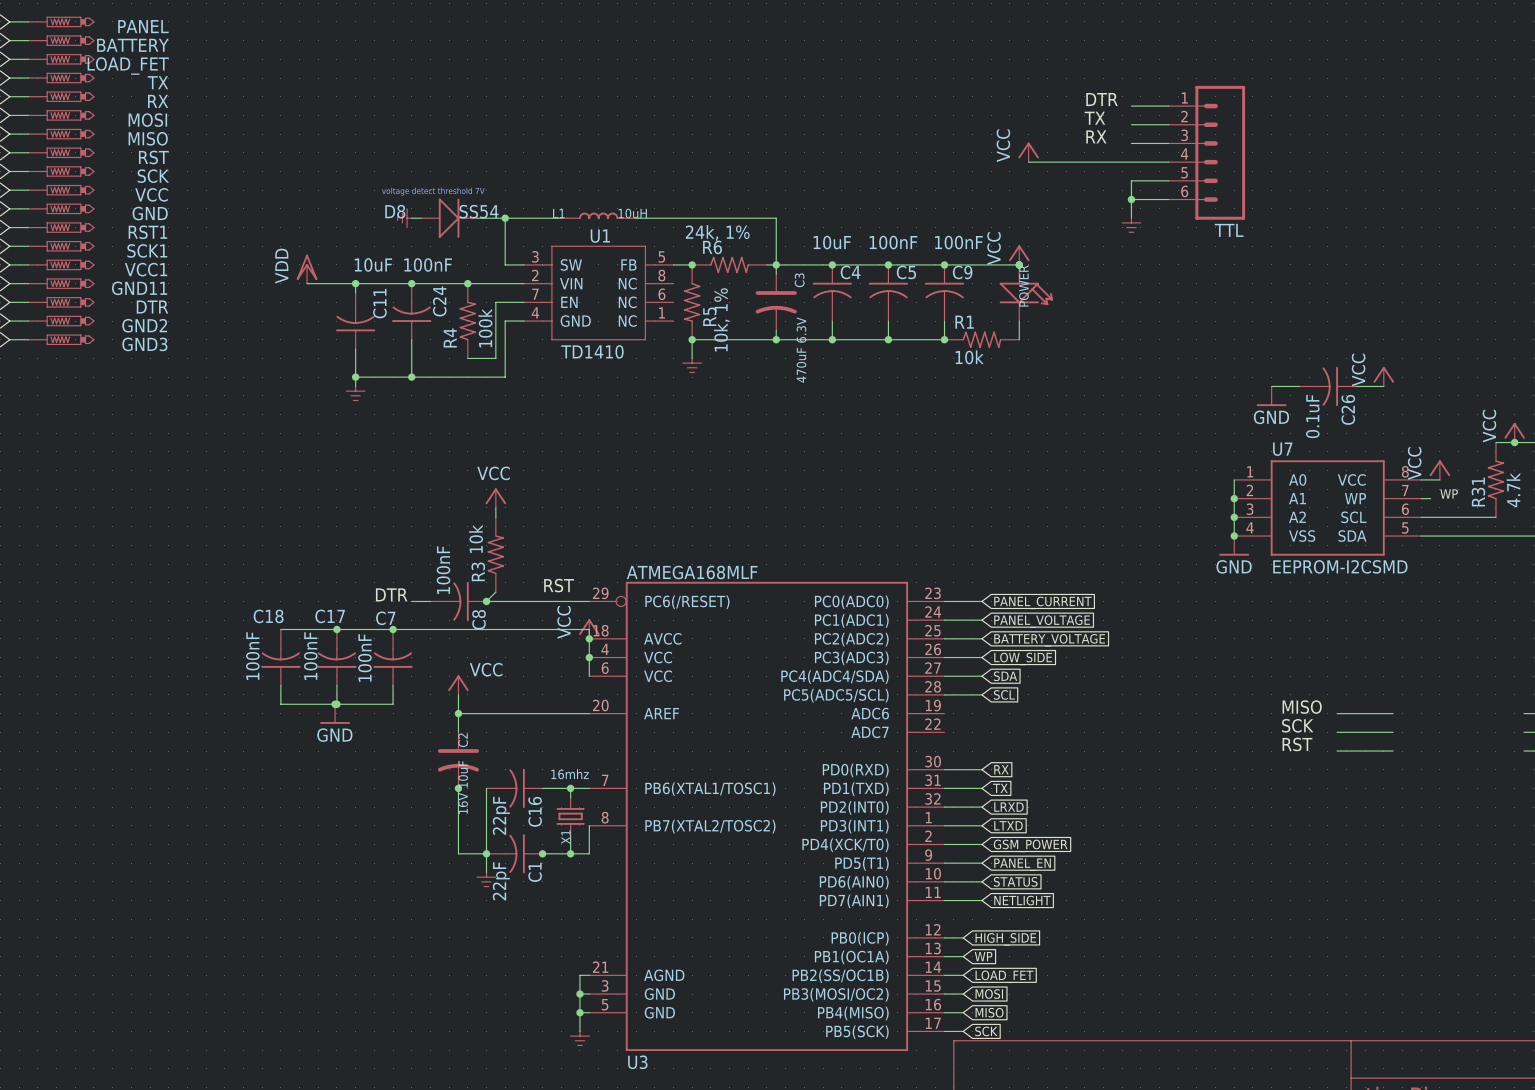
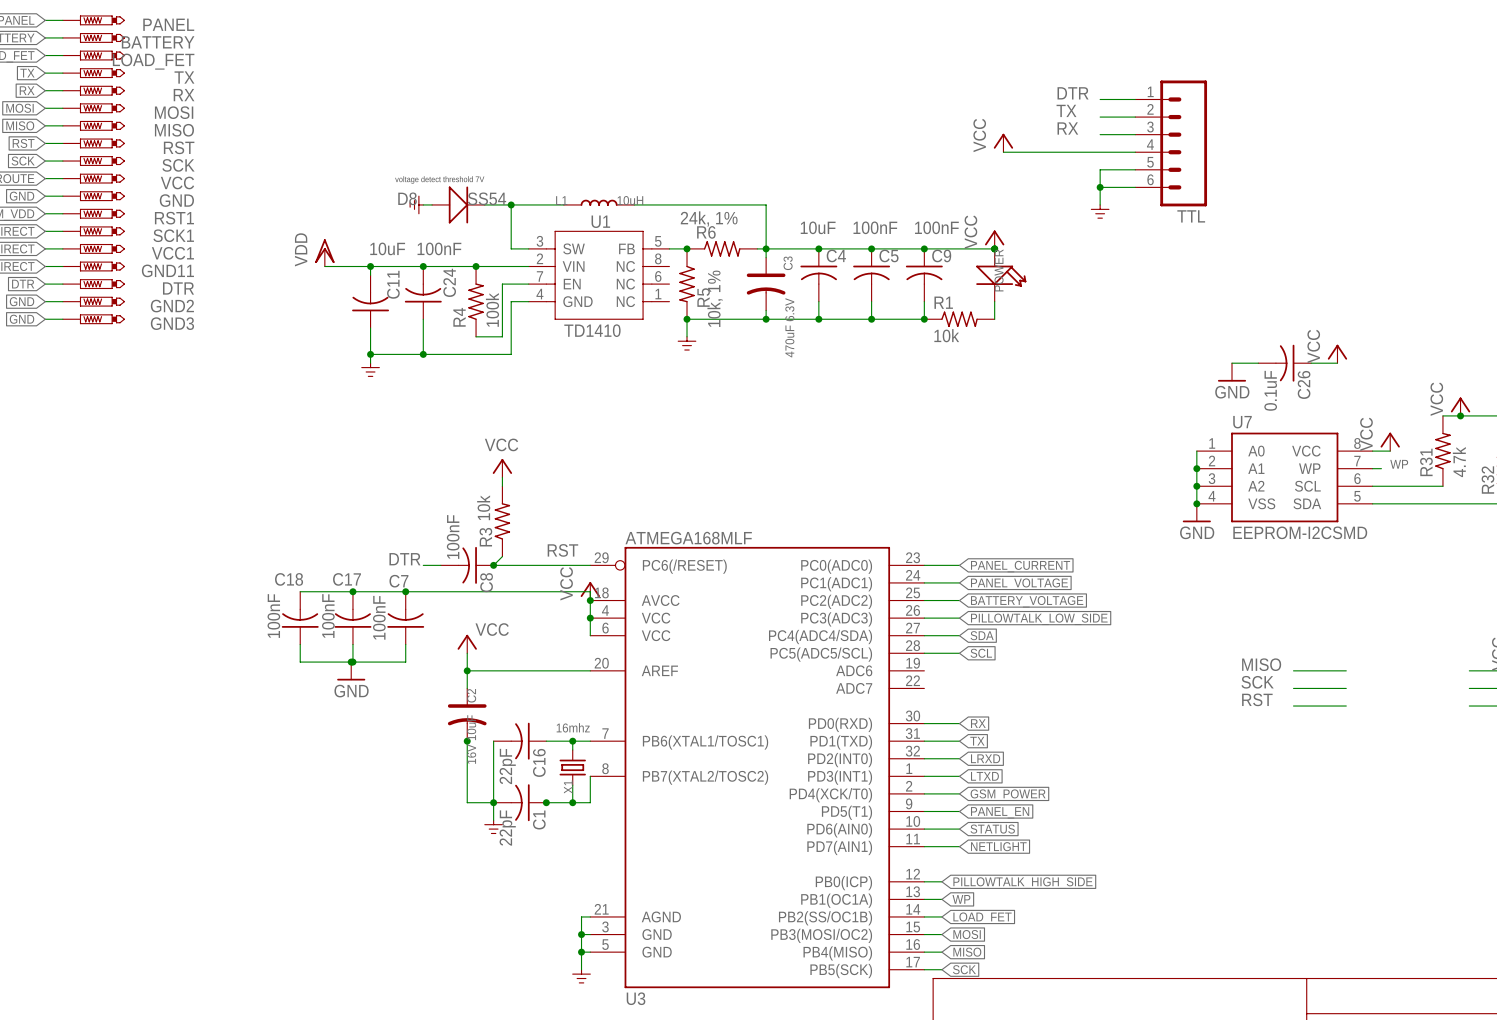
global label: LOW_SIDE (1023, 658) -> PILLOWTALK_LOW_SIDE (1039, 619)
global label: HIGH_SIDE (1005, 939) -> PILLOWTALK_HIGH_SIDE (1022, 883)

